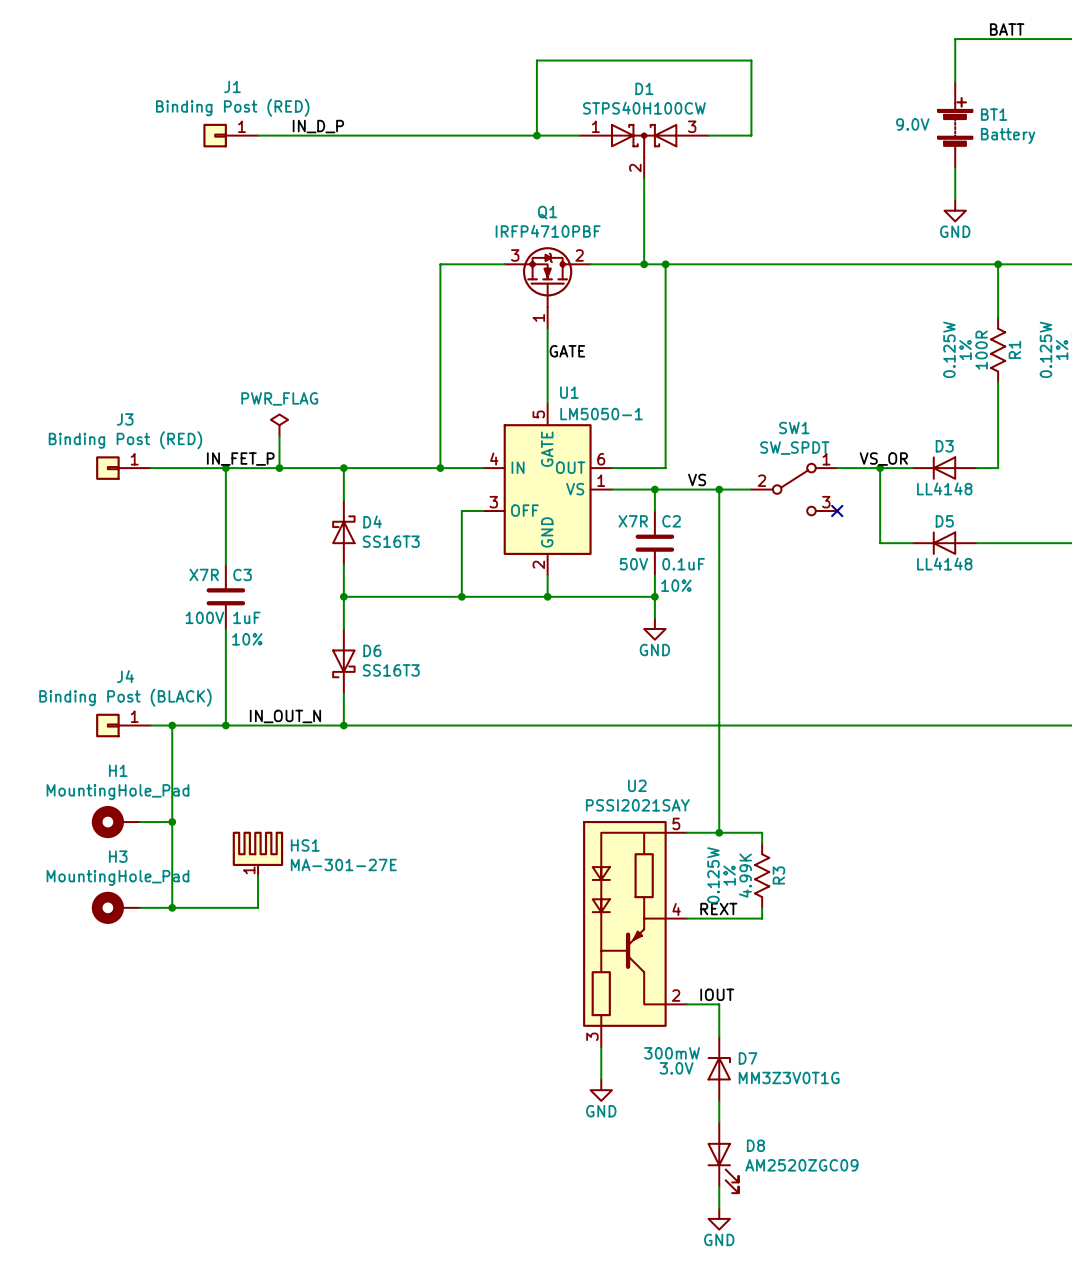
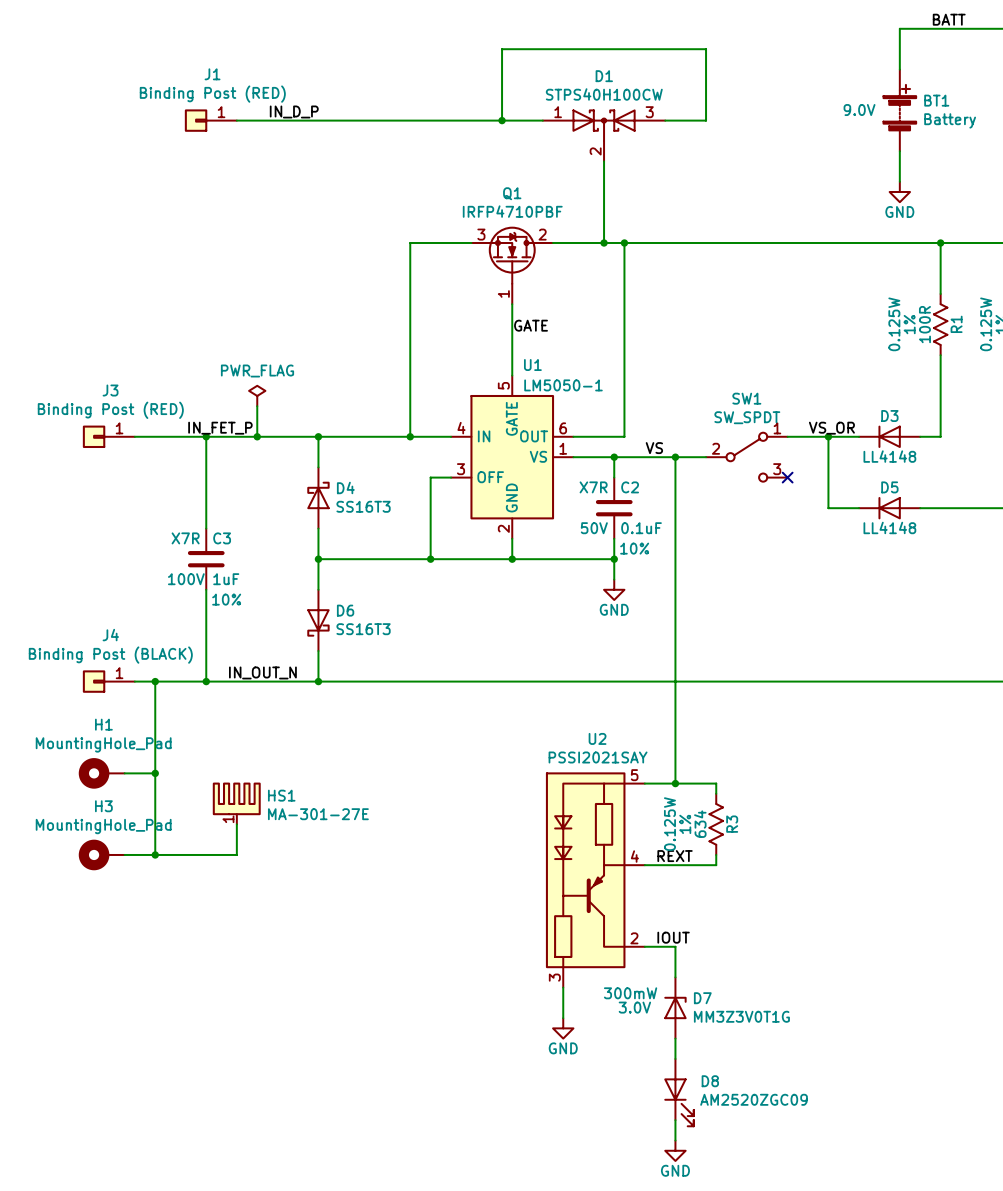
R3 value: 4.99K (745, 875) -> 634 (700, 824)

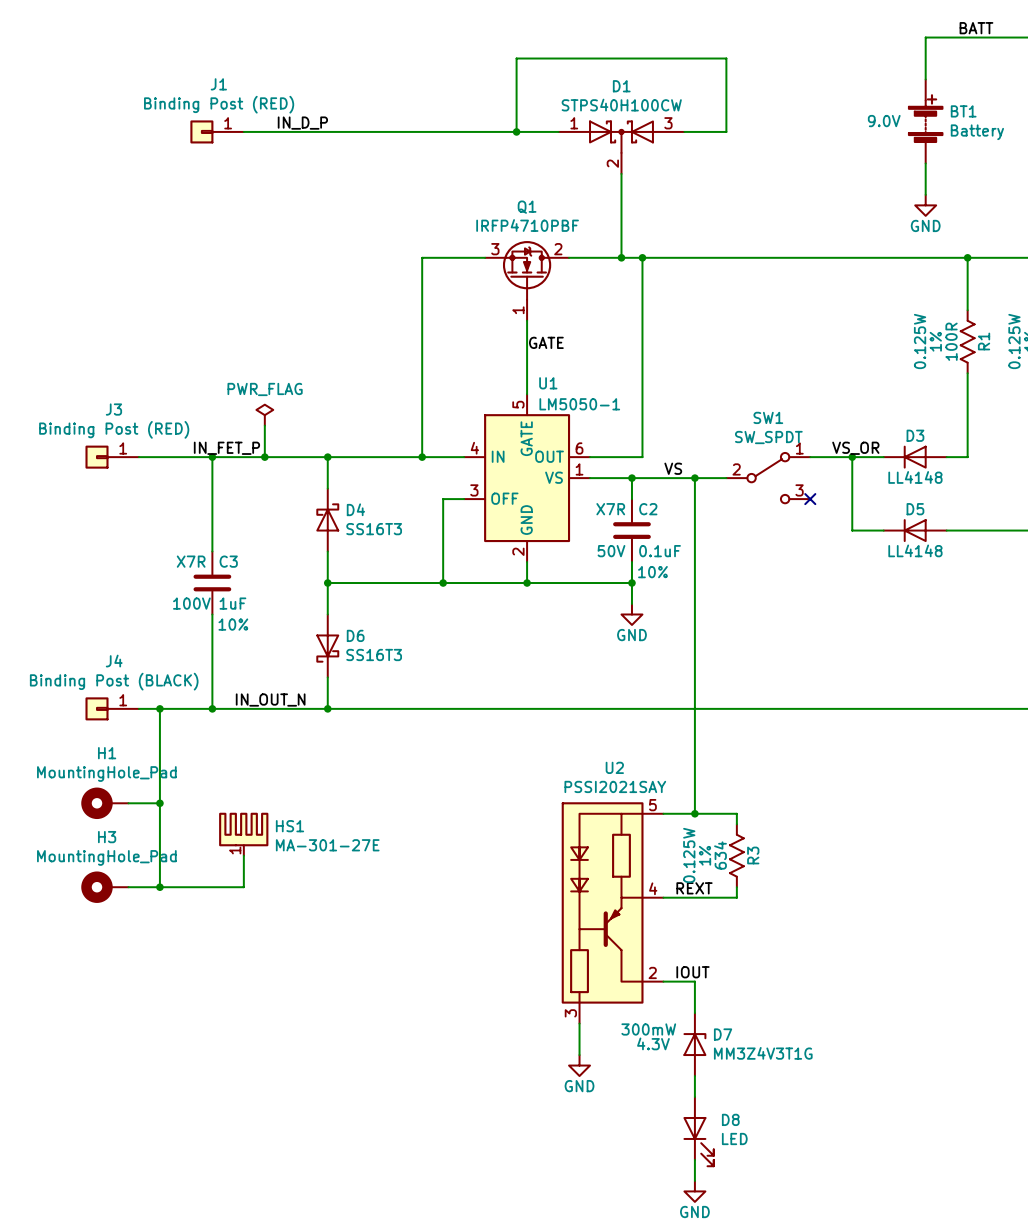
D7 text: 3.0V (634, 1007) -> 4.3V (653, 1043)
D7 value: MM3Z3V0T1G (741, 1016) -> MM3Z4V3T1G (763, 1053)
D8 value: AM2520ZGC09 (754, 1099) -> LED (734, 1138)

